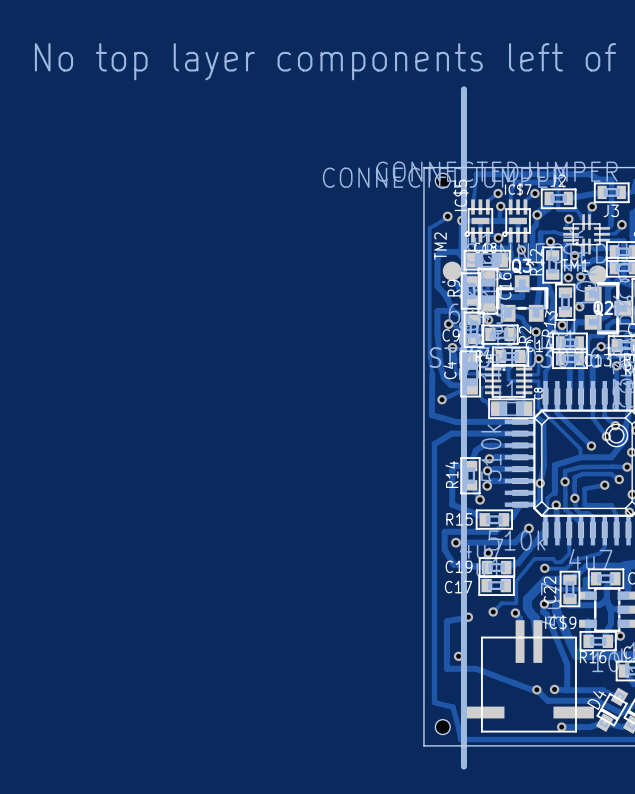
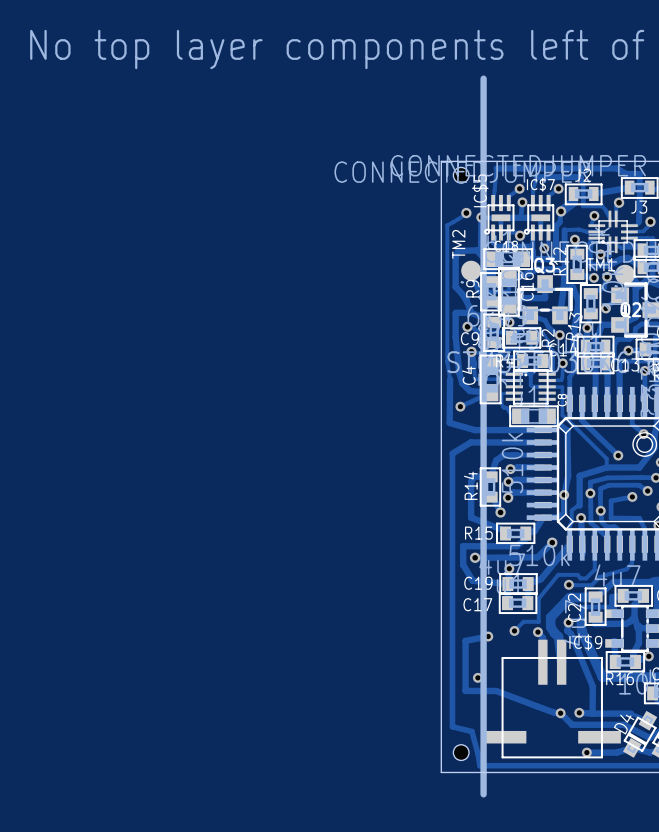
track: (592, 396) (592, 418) (606, 436) -> none
via: (606, 436) -> none

